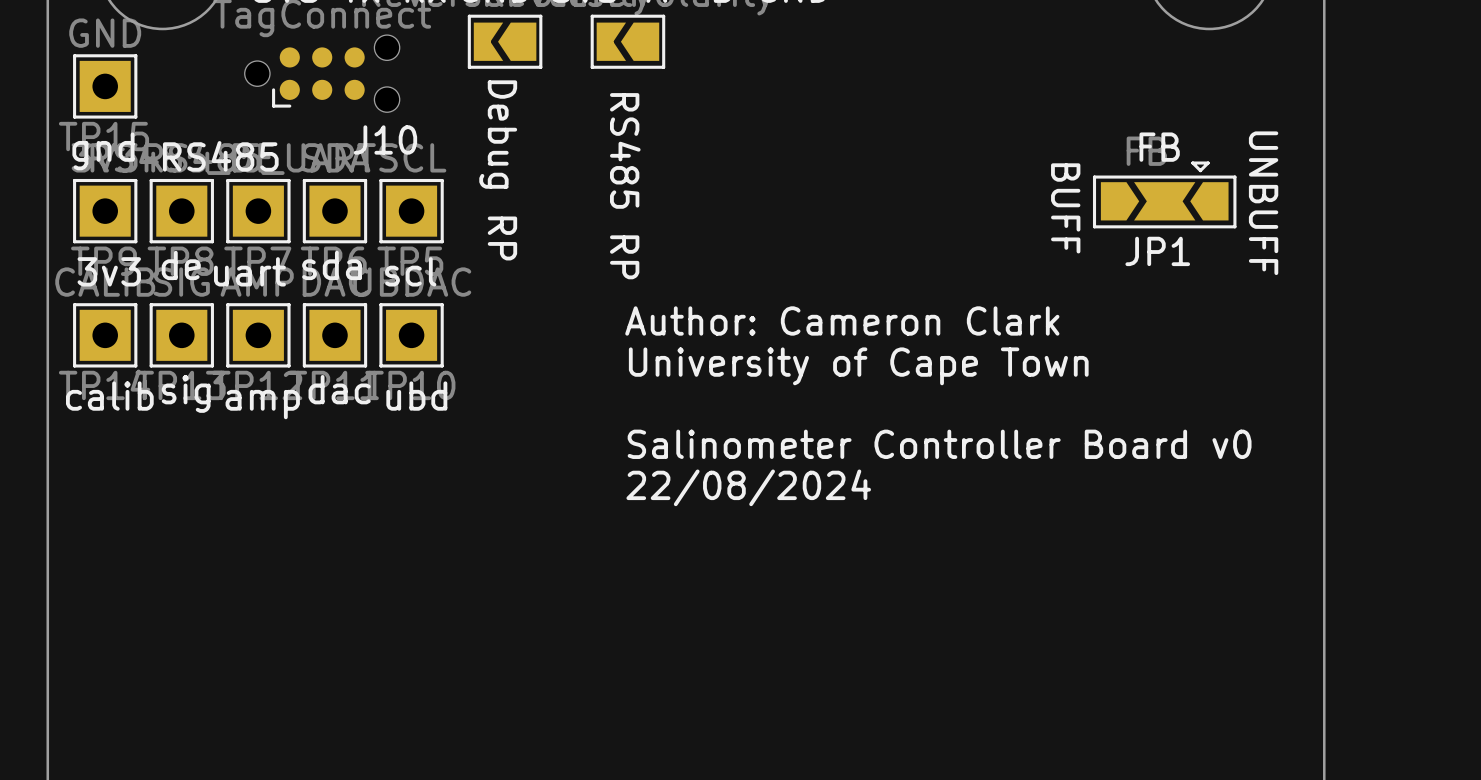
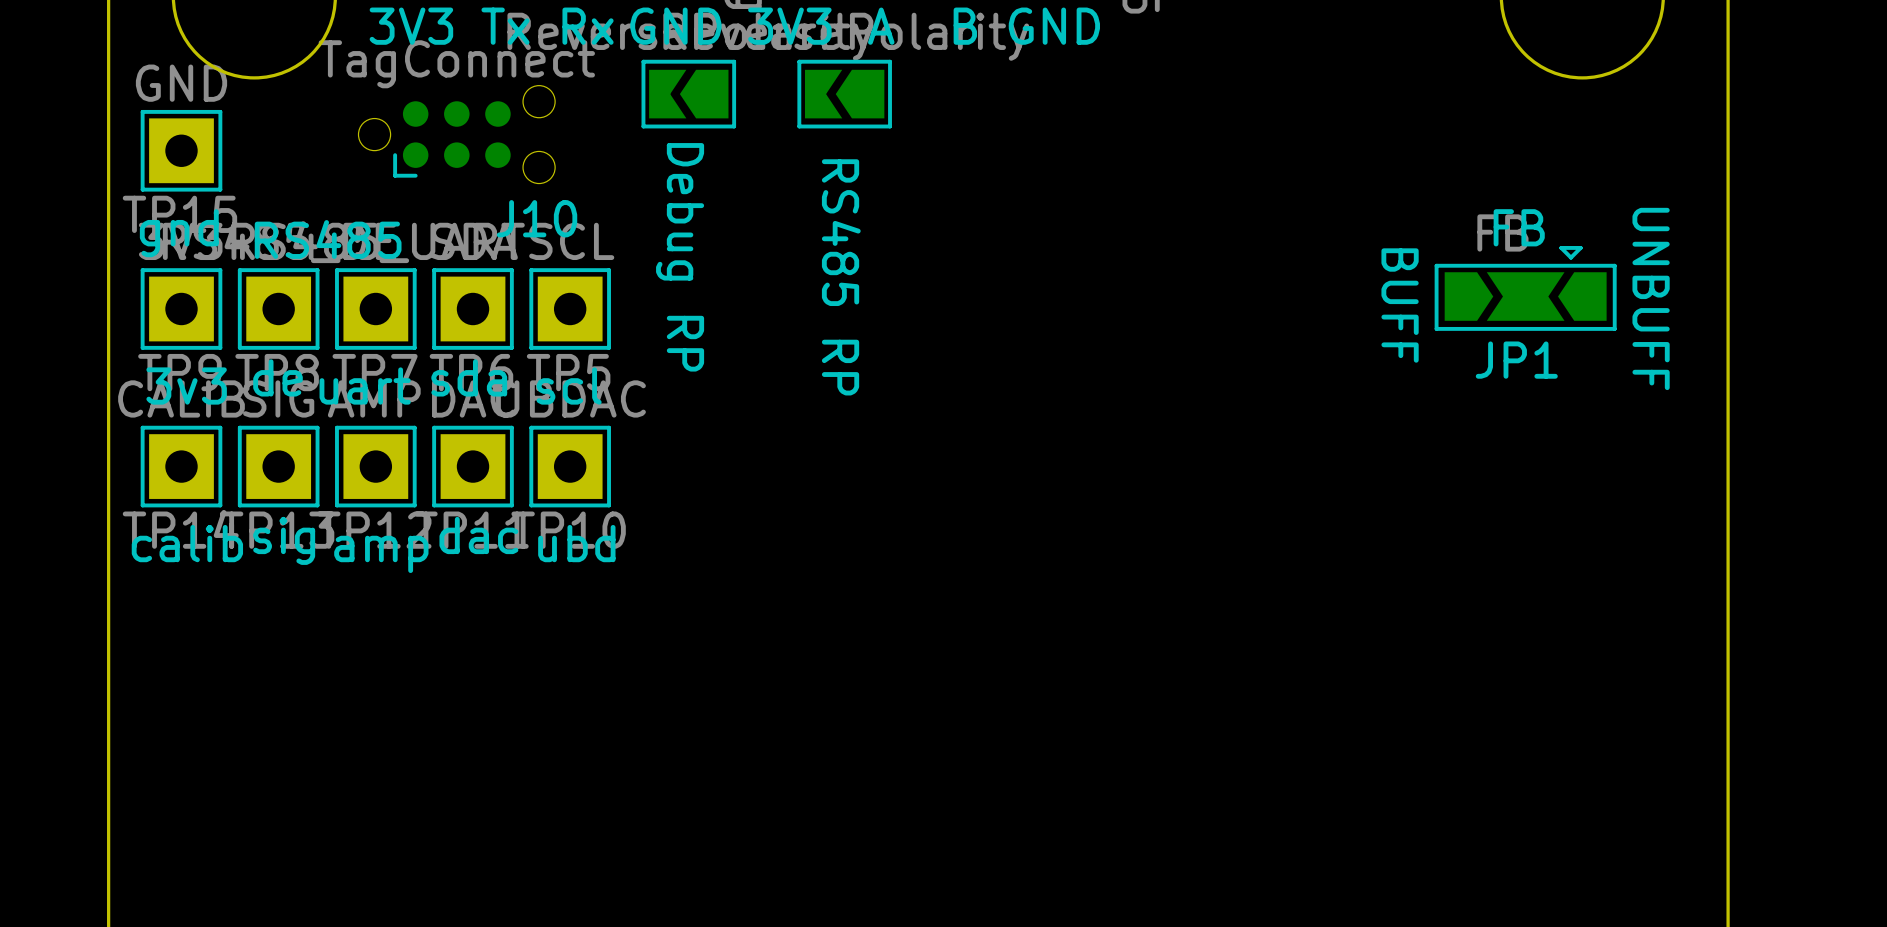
text: Author: Cameron Clark (842, 320) -> none
text: University of Cape Town (858, 366) -> none
text: Salinometer Controller Board v0 (939, 444) -> none
text: 22/08/2024 (748, 487) -> none

